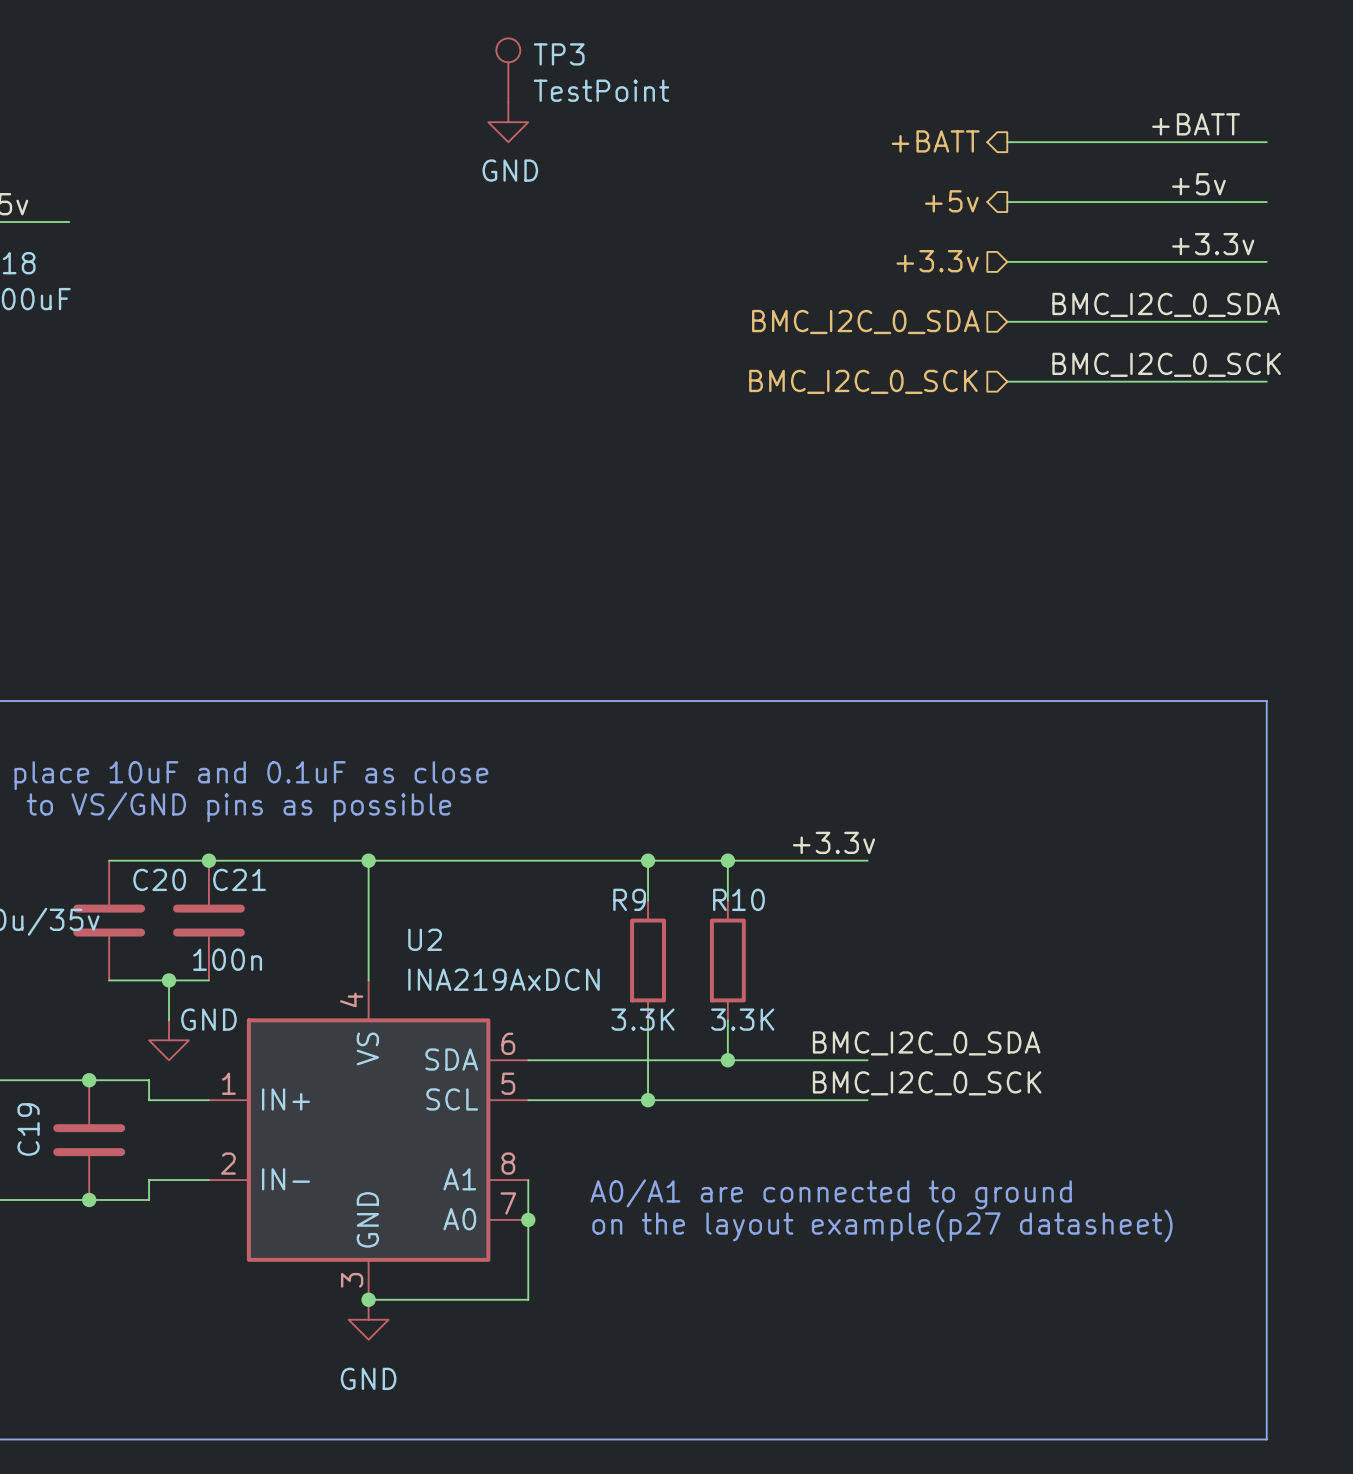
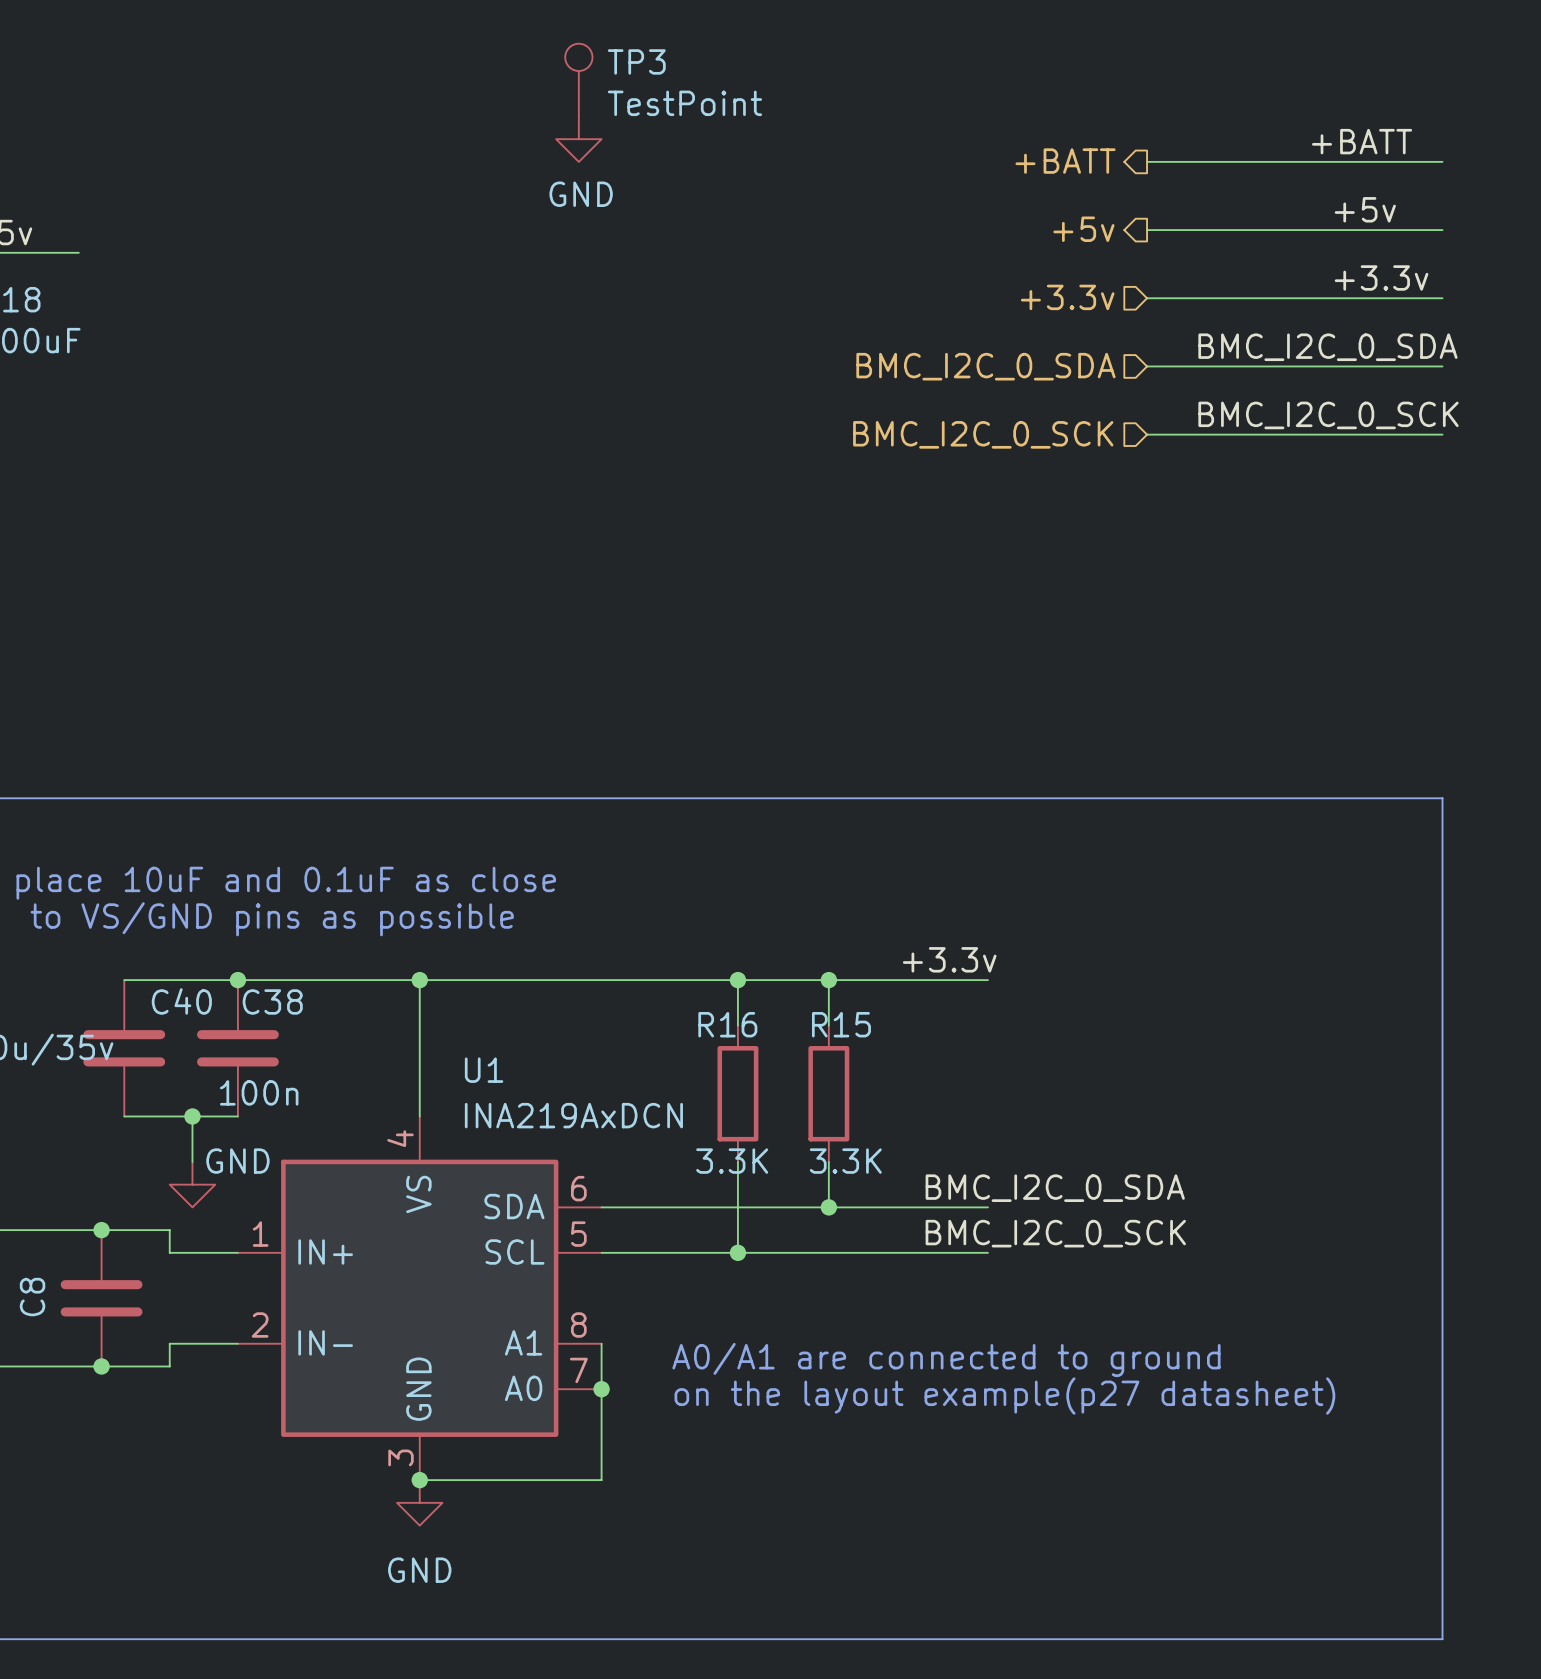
C20 name: C20 (159, 879) -> C40 (181, 1001)
C21 name: C21 (239, 879) -> C38 (272, 1001)
R9 name: R9 (629, 899) -> R16 (727, 1024)
R10 name: R10 (738, 899) -> R15 (841, 1024)
U2 name: U2 (425, 939) -> U1 (484, 1070)
C19 name: C19 (28, 1129) -> C8 (32, 1297)

